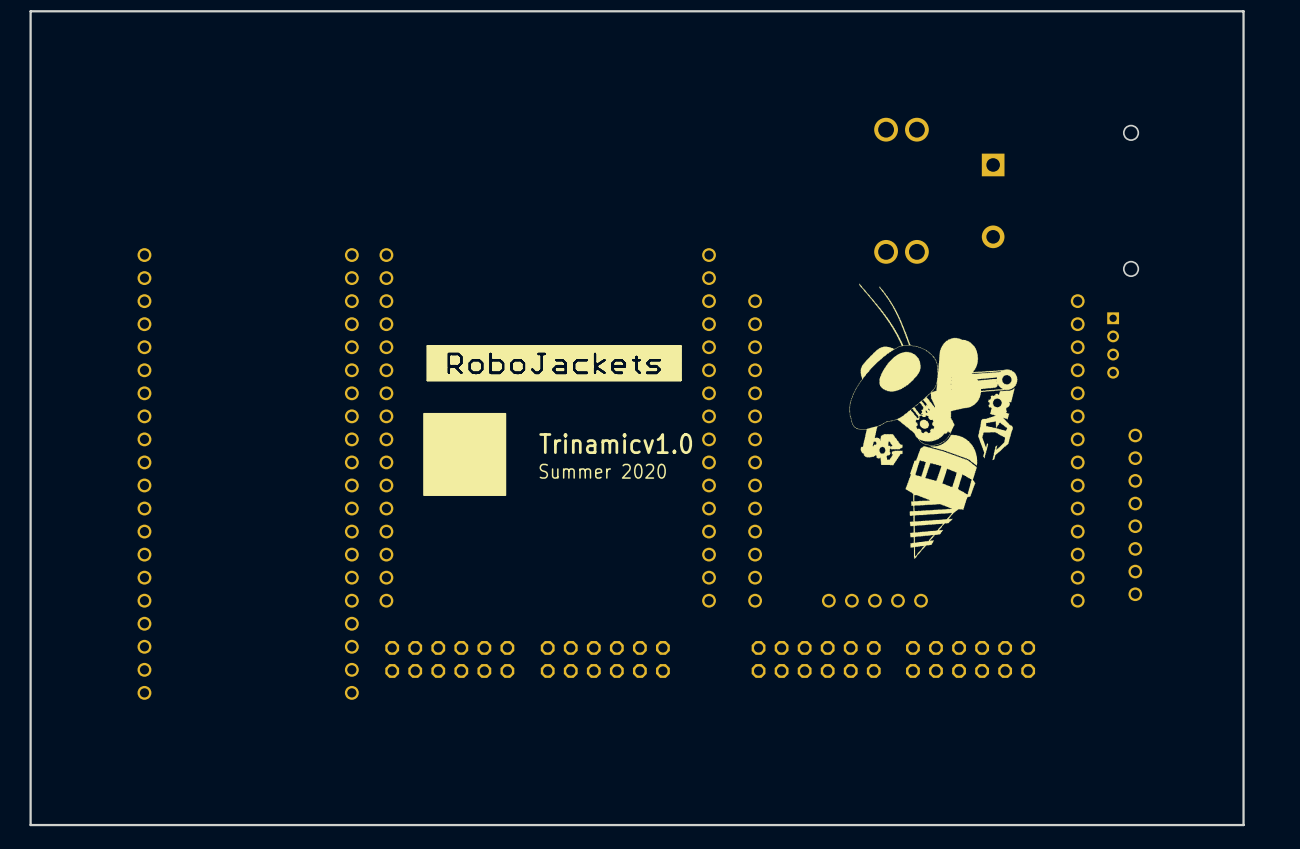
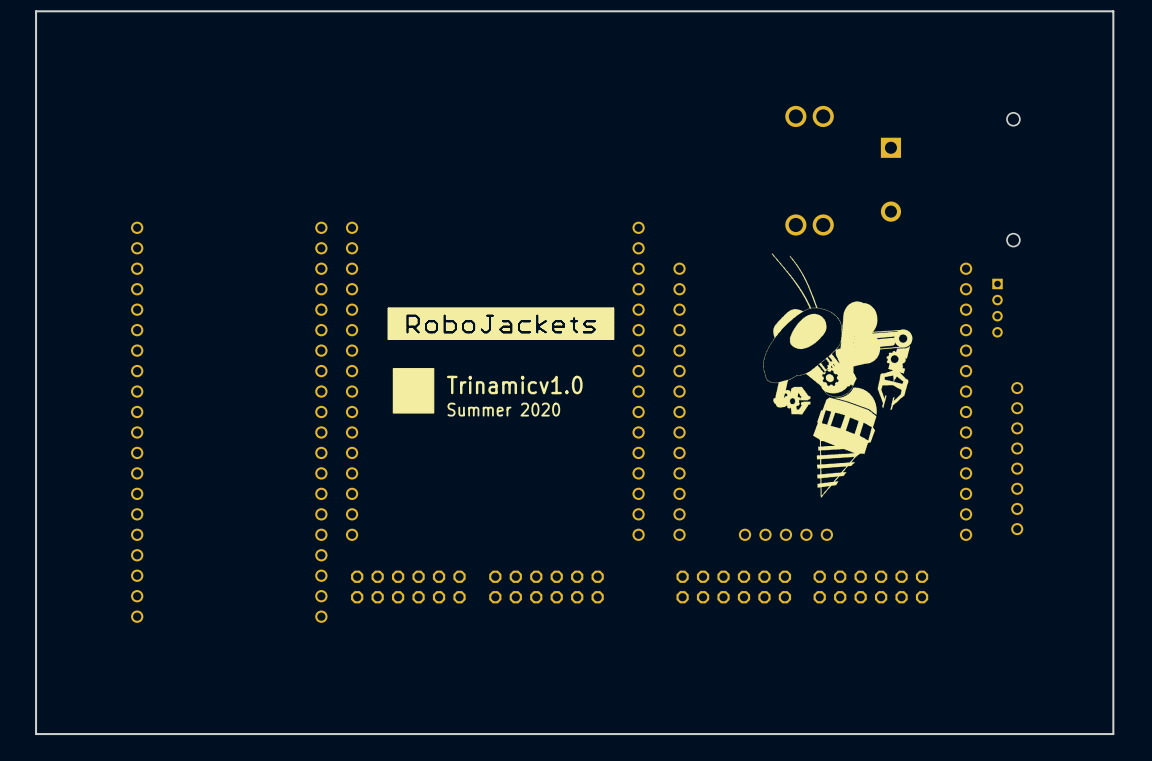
drawing: [423, 412, 507, 496] -> none
drawing: none -> [392, 368, 435, 414]
text position: Trinamic (590, 443) -> Trinamic (491, 385)
text position: v1.0 (667, 443) -> v1.0 (561, 385)
text position: Summer 2020 (602, 471) -> Summer 2020 (503, 409)

